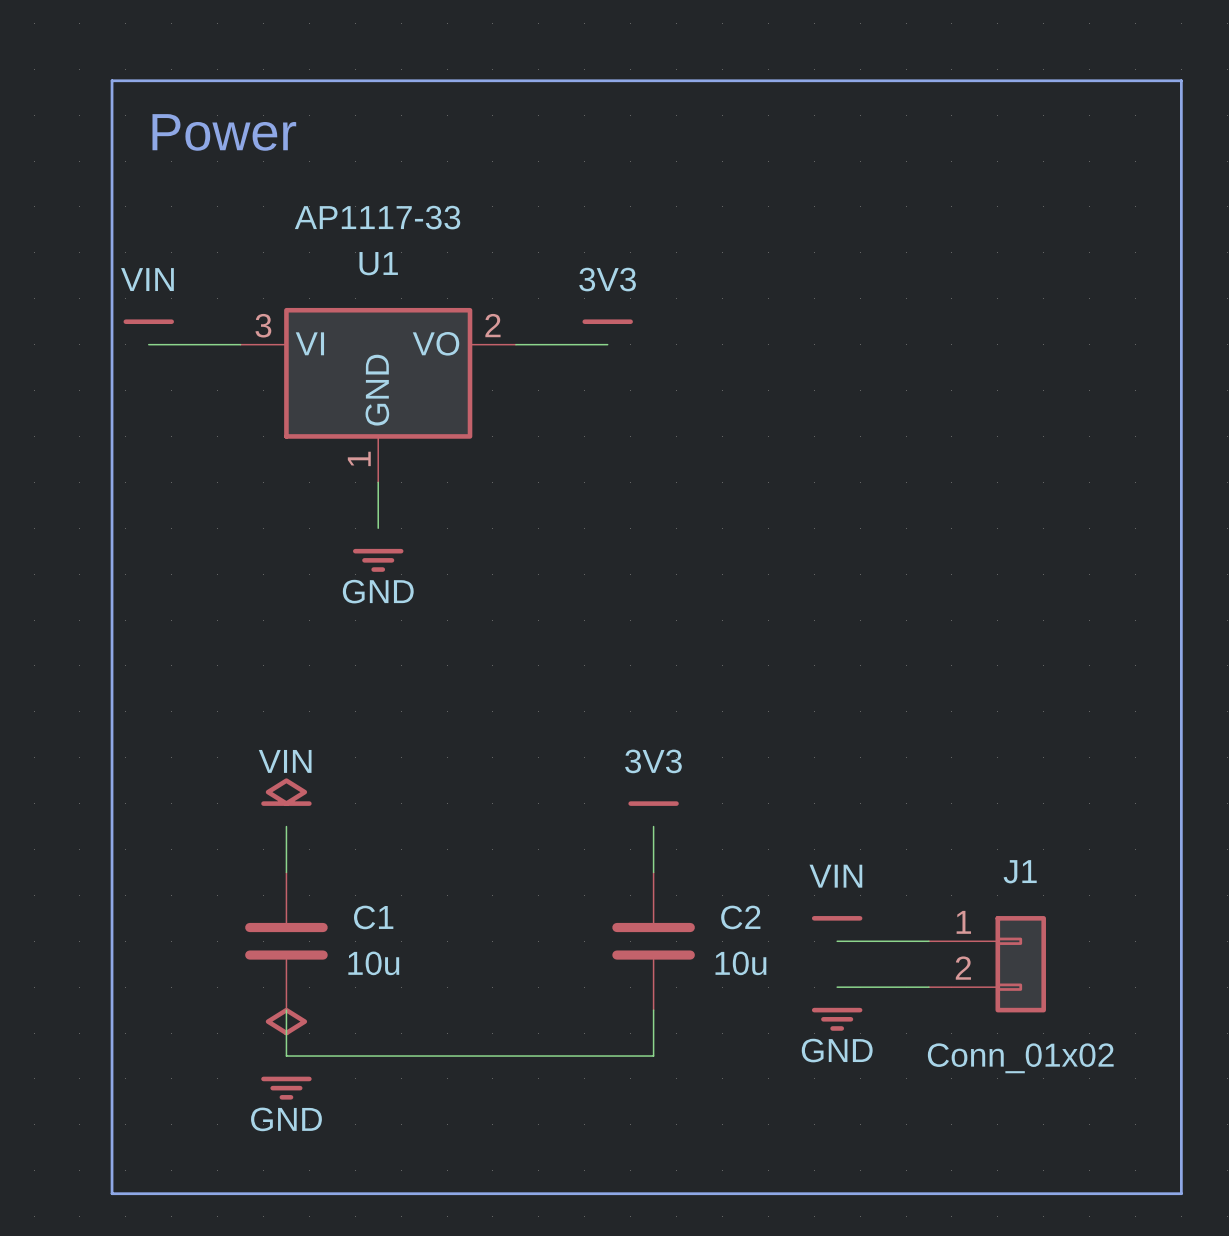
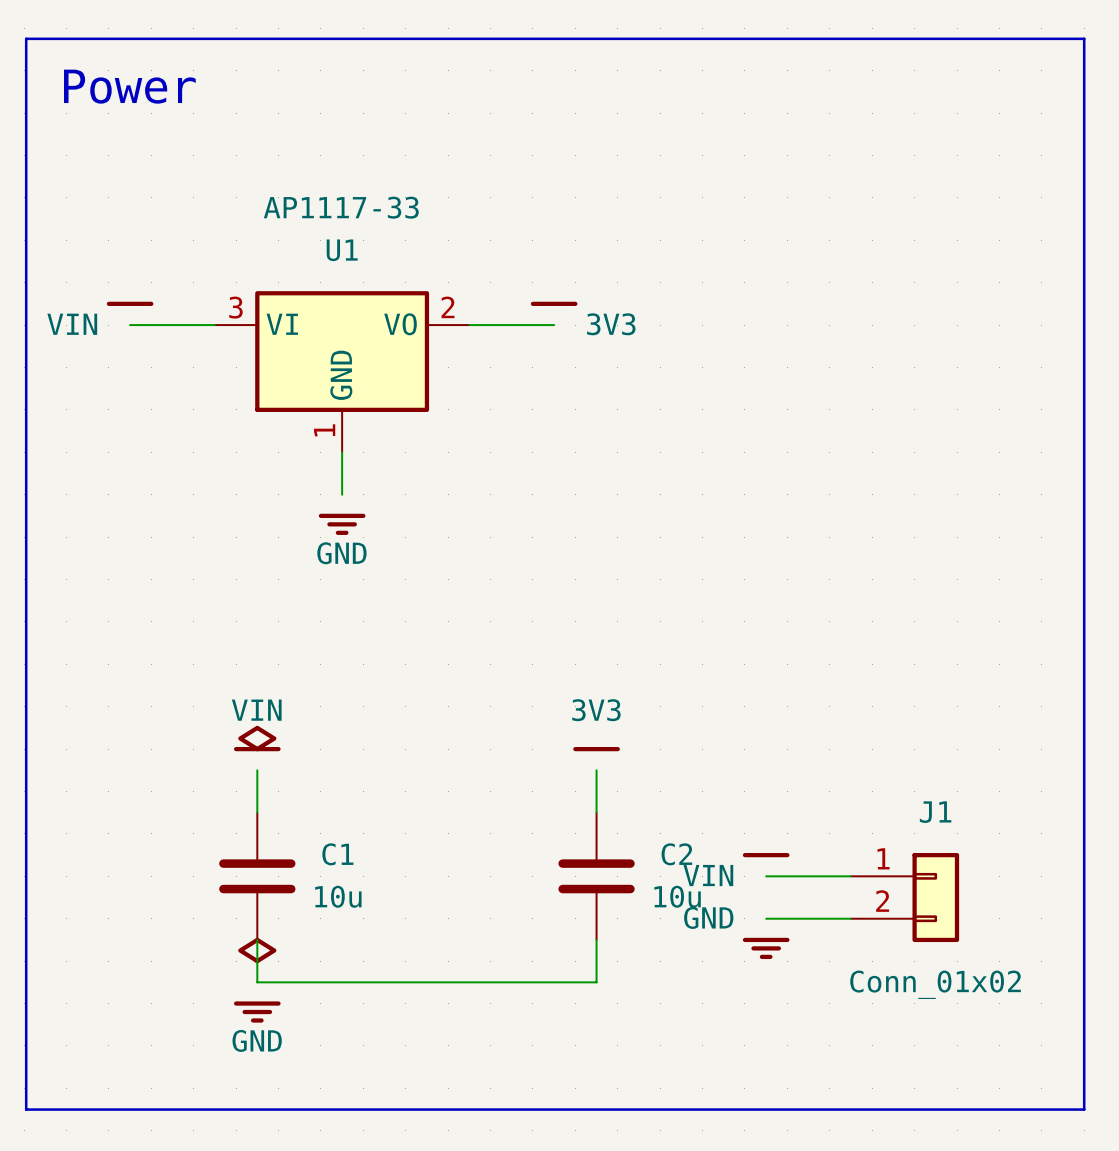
line: (1181, 80) (112, 80) (112, 1193) -> (1084, 81) (1084, 38) (26, 38) (26, 1109) (96, 1109)
text position: Power (224, 132) -> Power (129, 86)
power symbol text position: VIN (147, 279) -> VIN (72, 324)
power symbol text position: 3V3 (607, 279) -> 3V3 (611, 324)
power symbol text position: VIN (835, 876) -> VIN (708, 875)
power symbol text position: GND (837, 1050) -> GND (708, 917)

